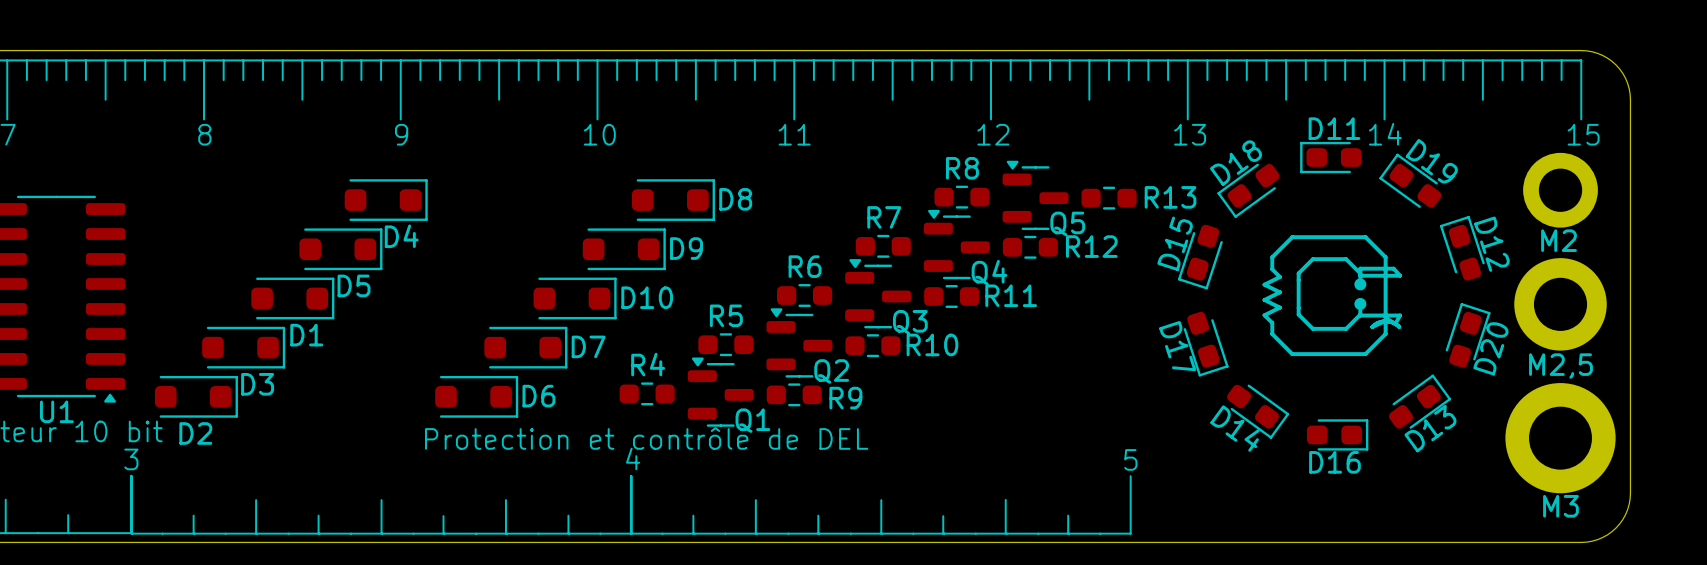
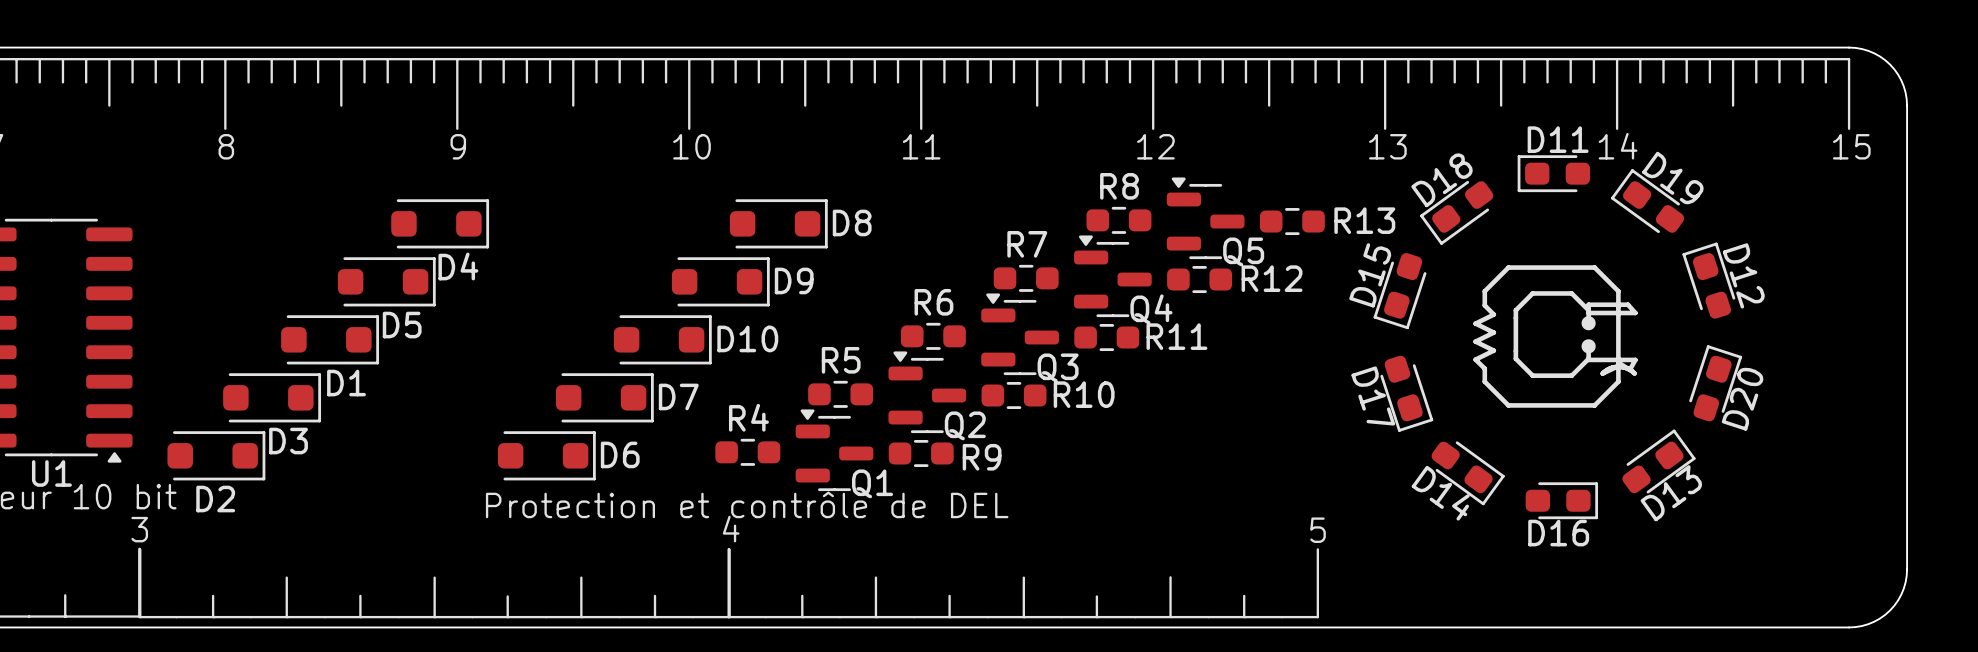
M2: (1560, 190) -> none
M2,5: (1560, 304) -> none
M3: (1560, 438) -> none

